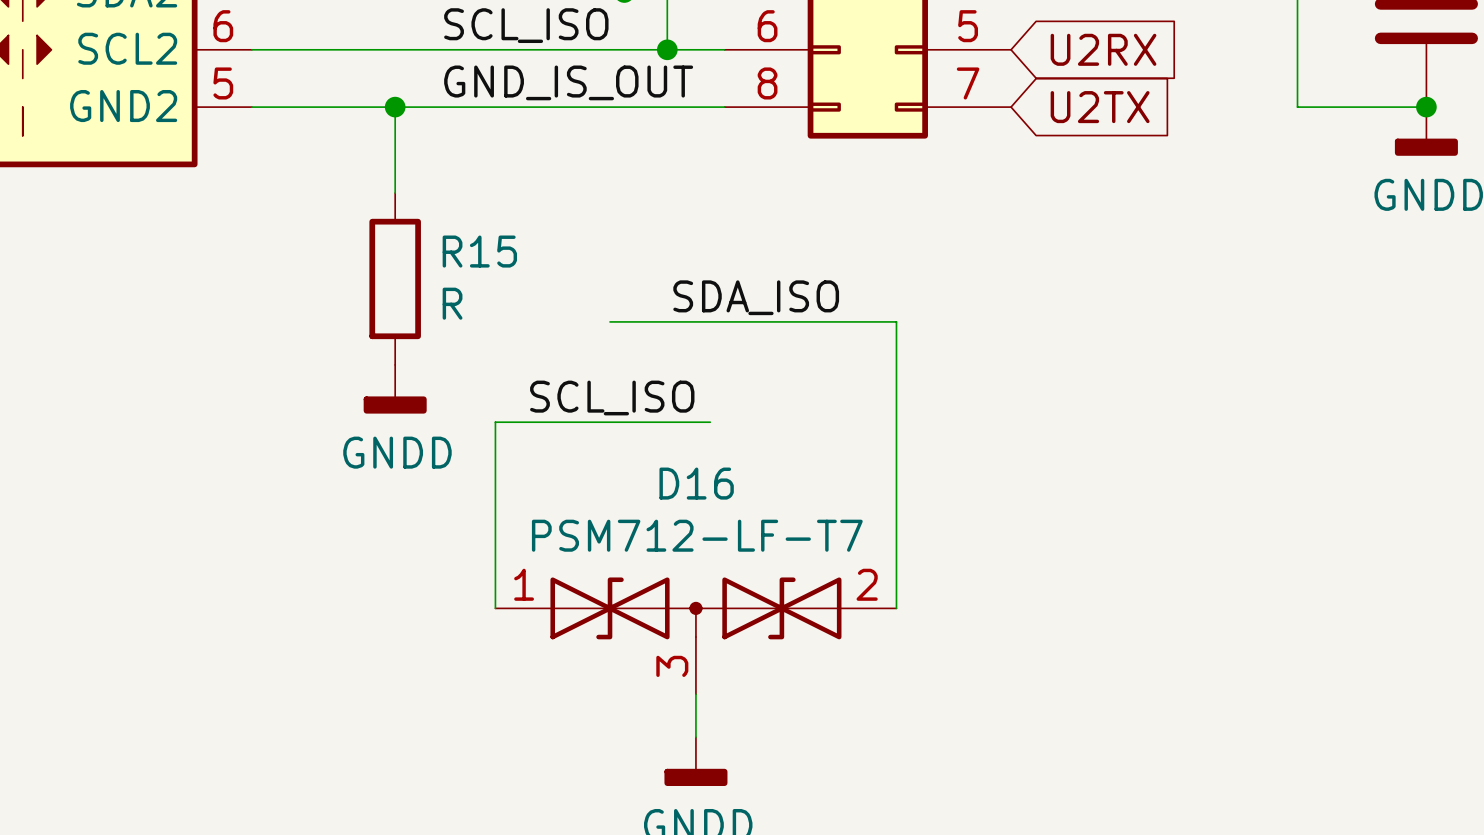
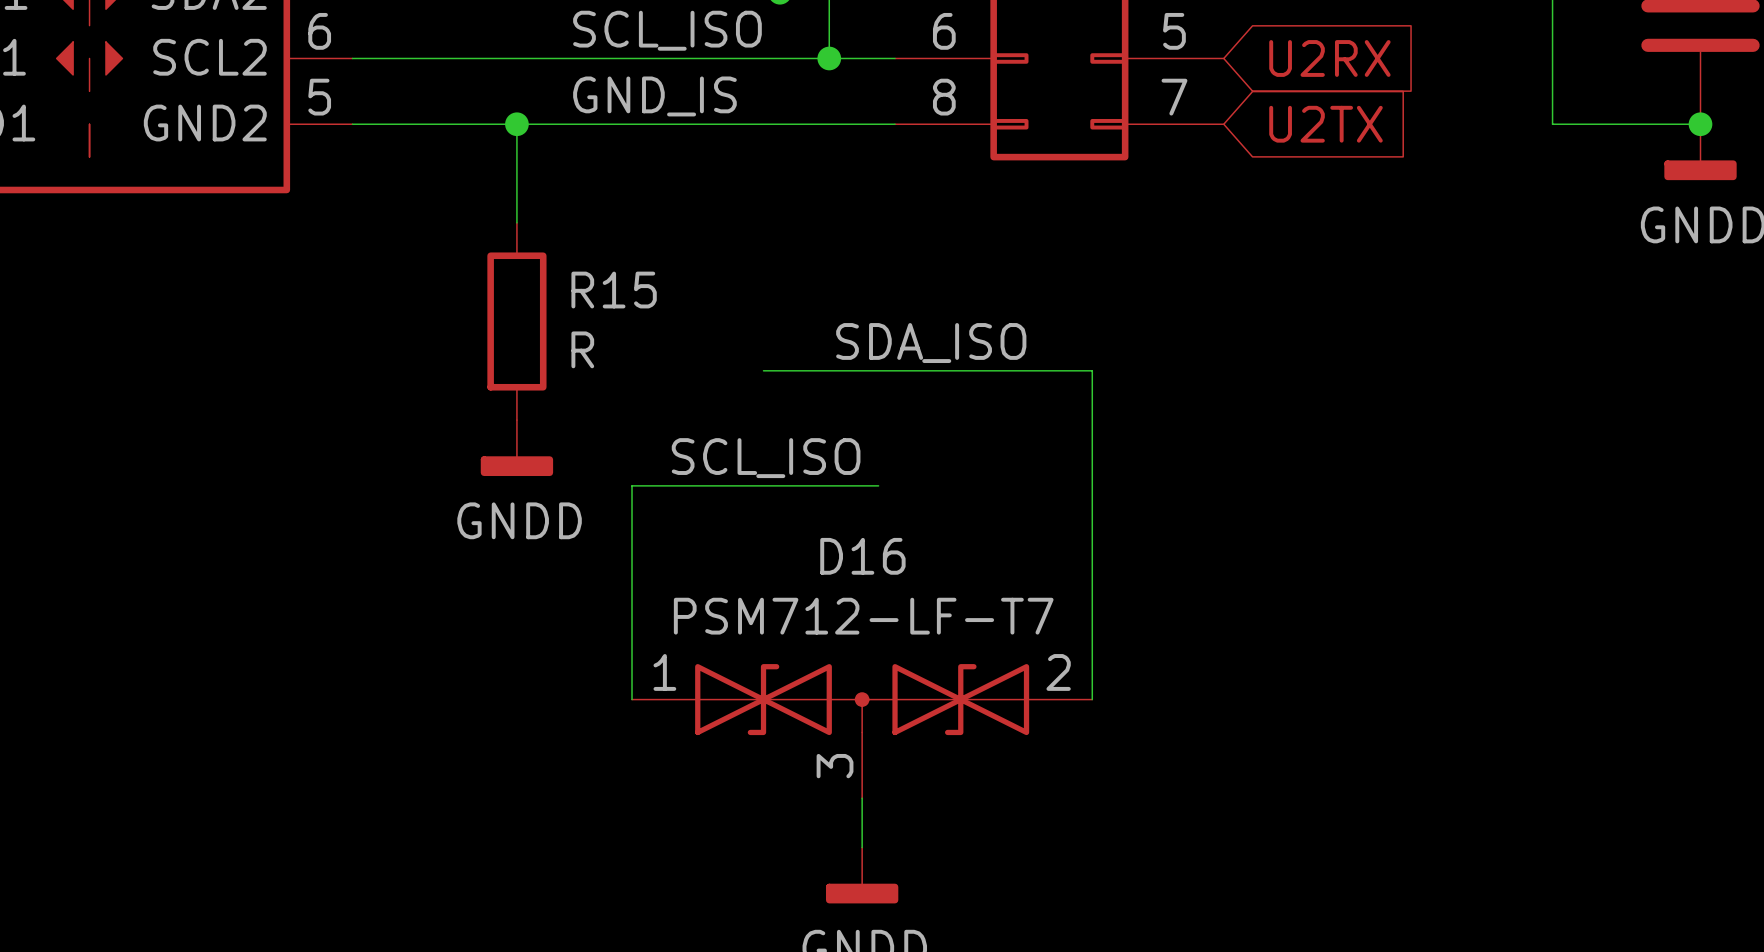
label: GND_IS_OUT (568, 82) -> GND_IS (654, 96)

